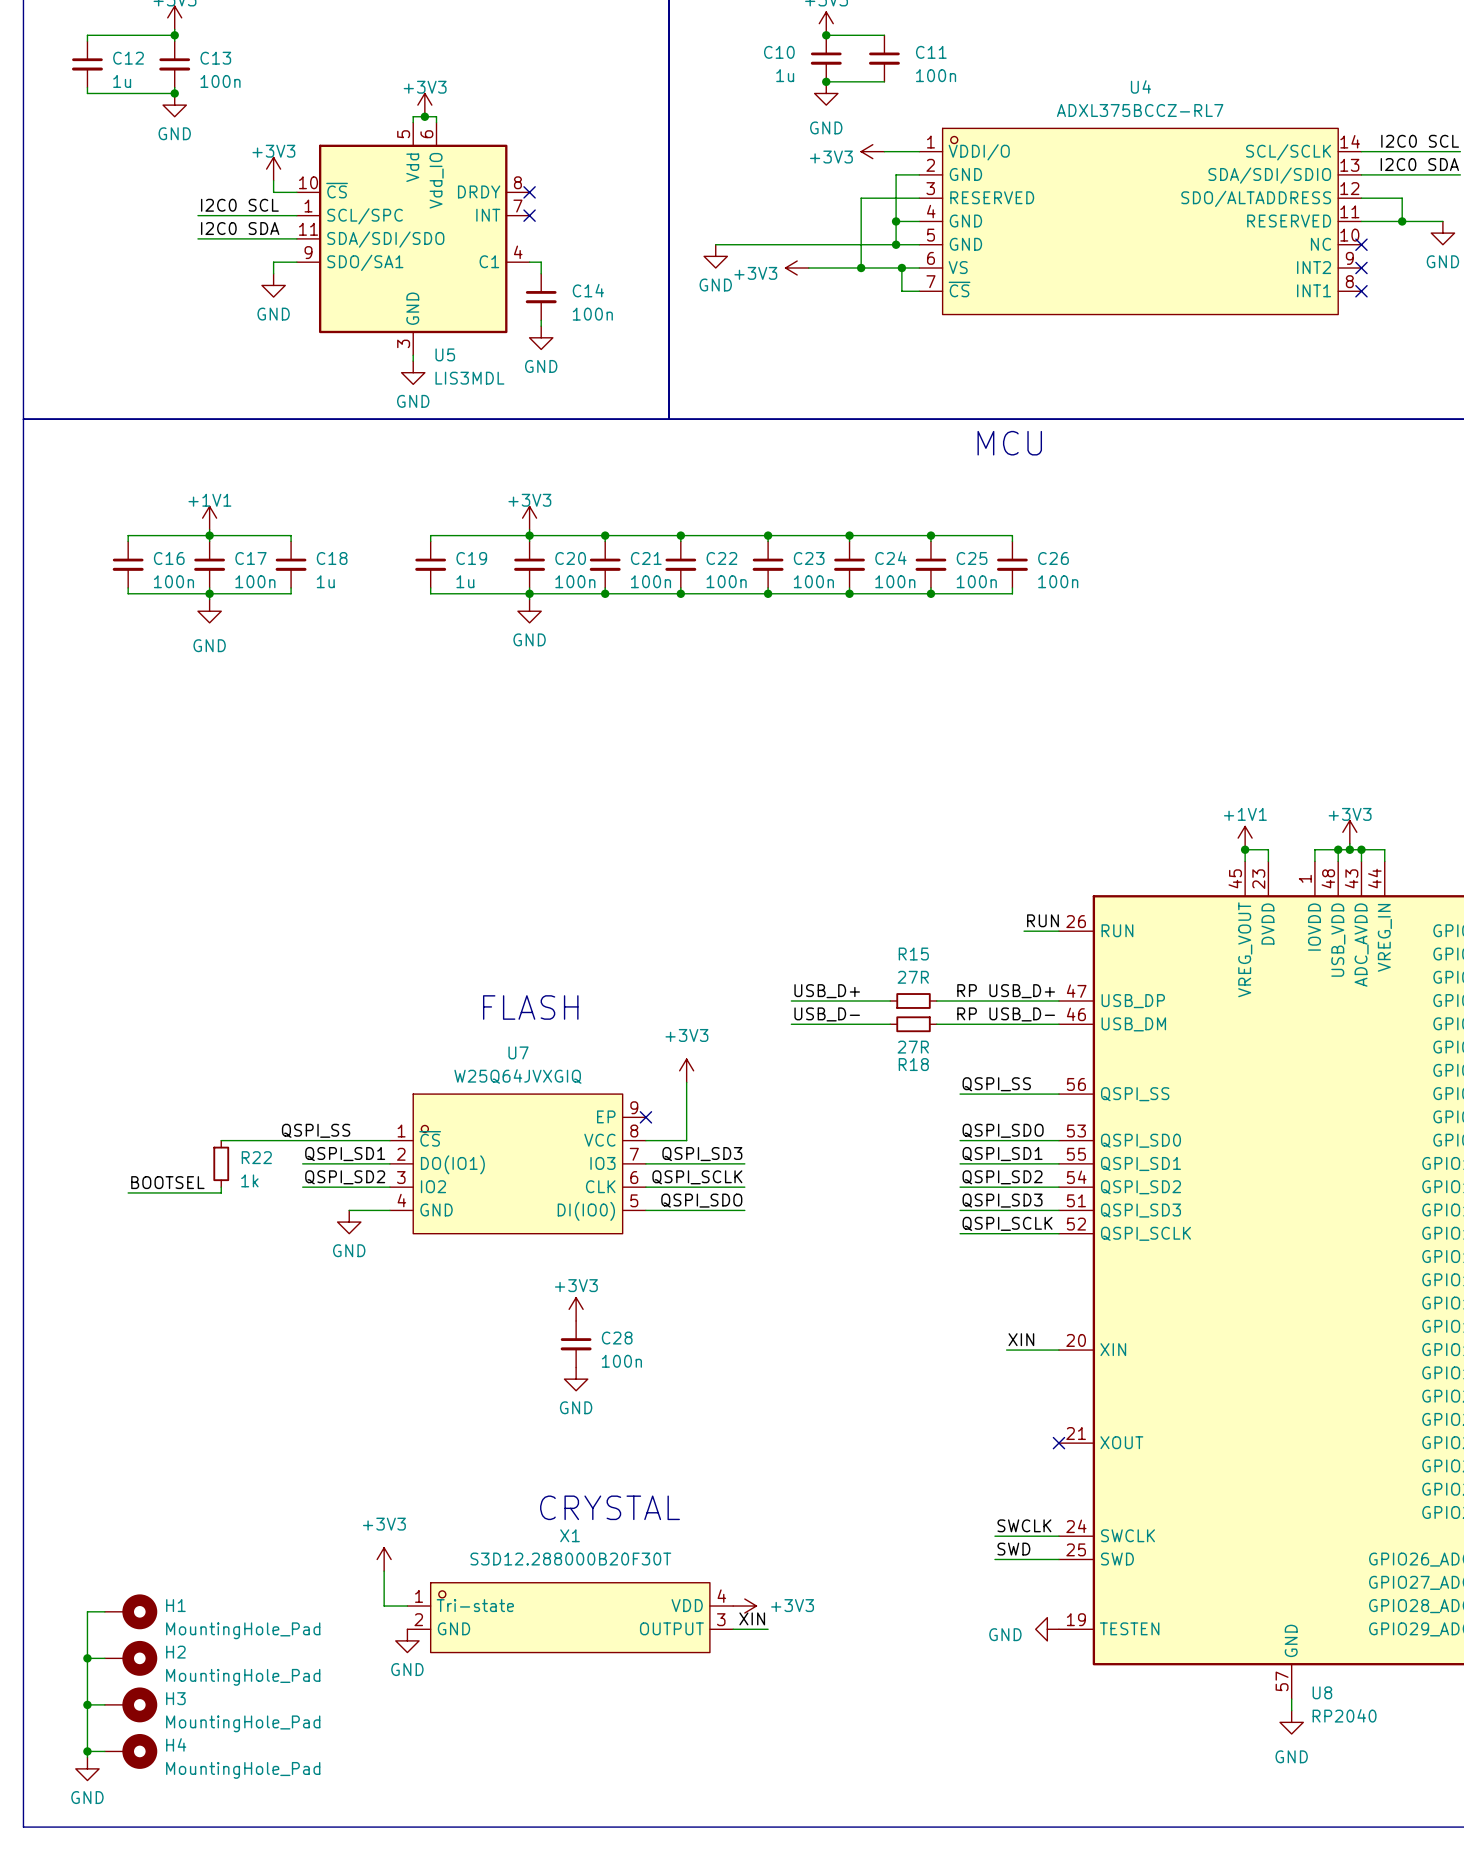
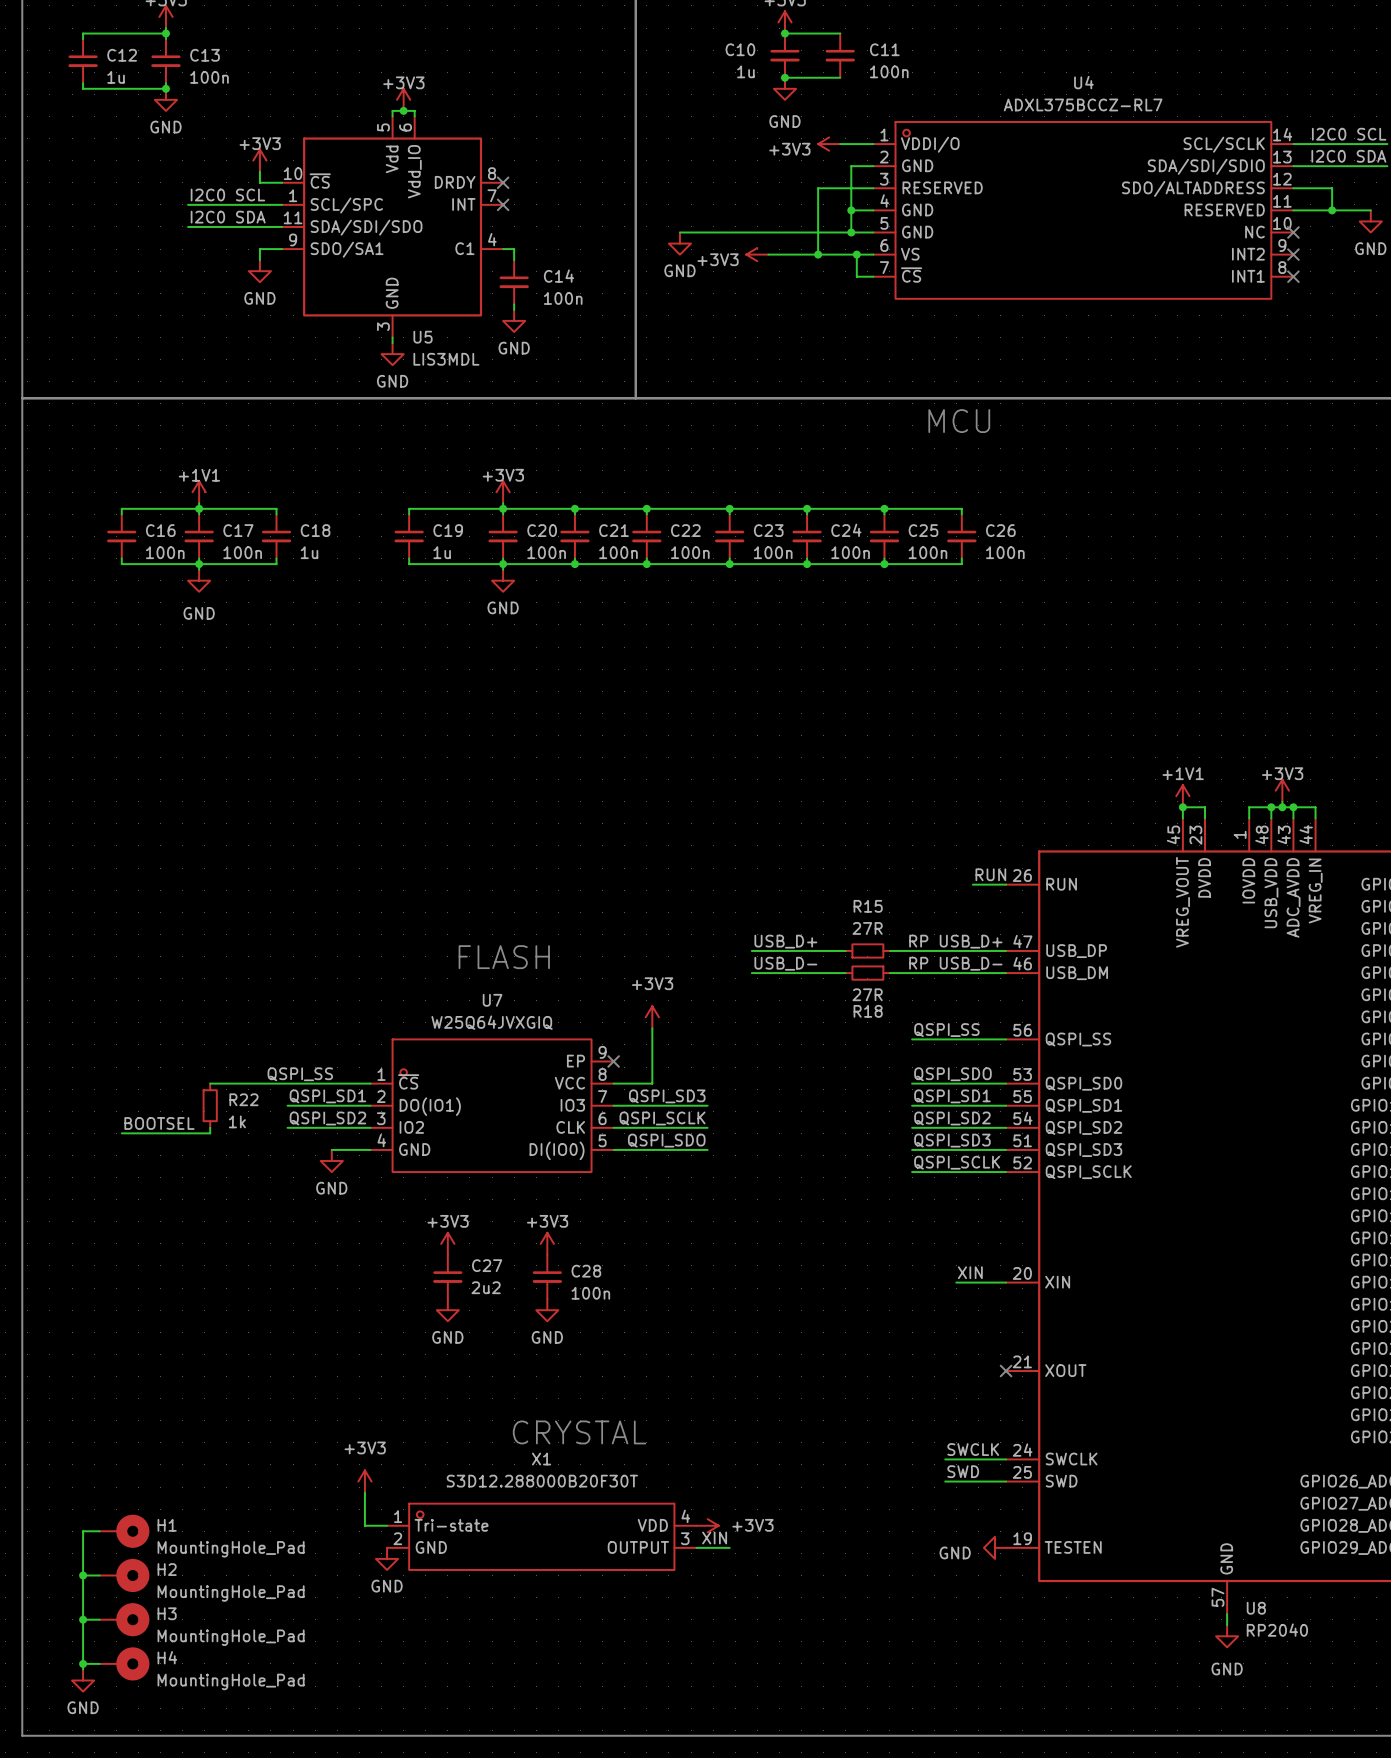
power symbol: none -> +3V3 (447, 1243)
C27: none -> 2u2 (447, 1277)
power symbol: none -> GND (447, 1310)

